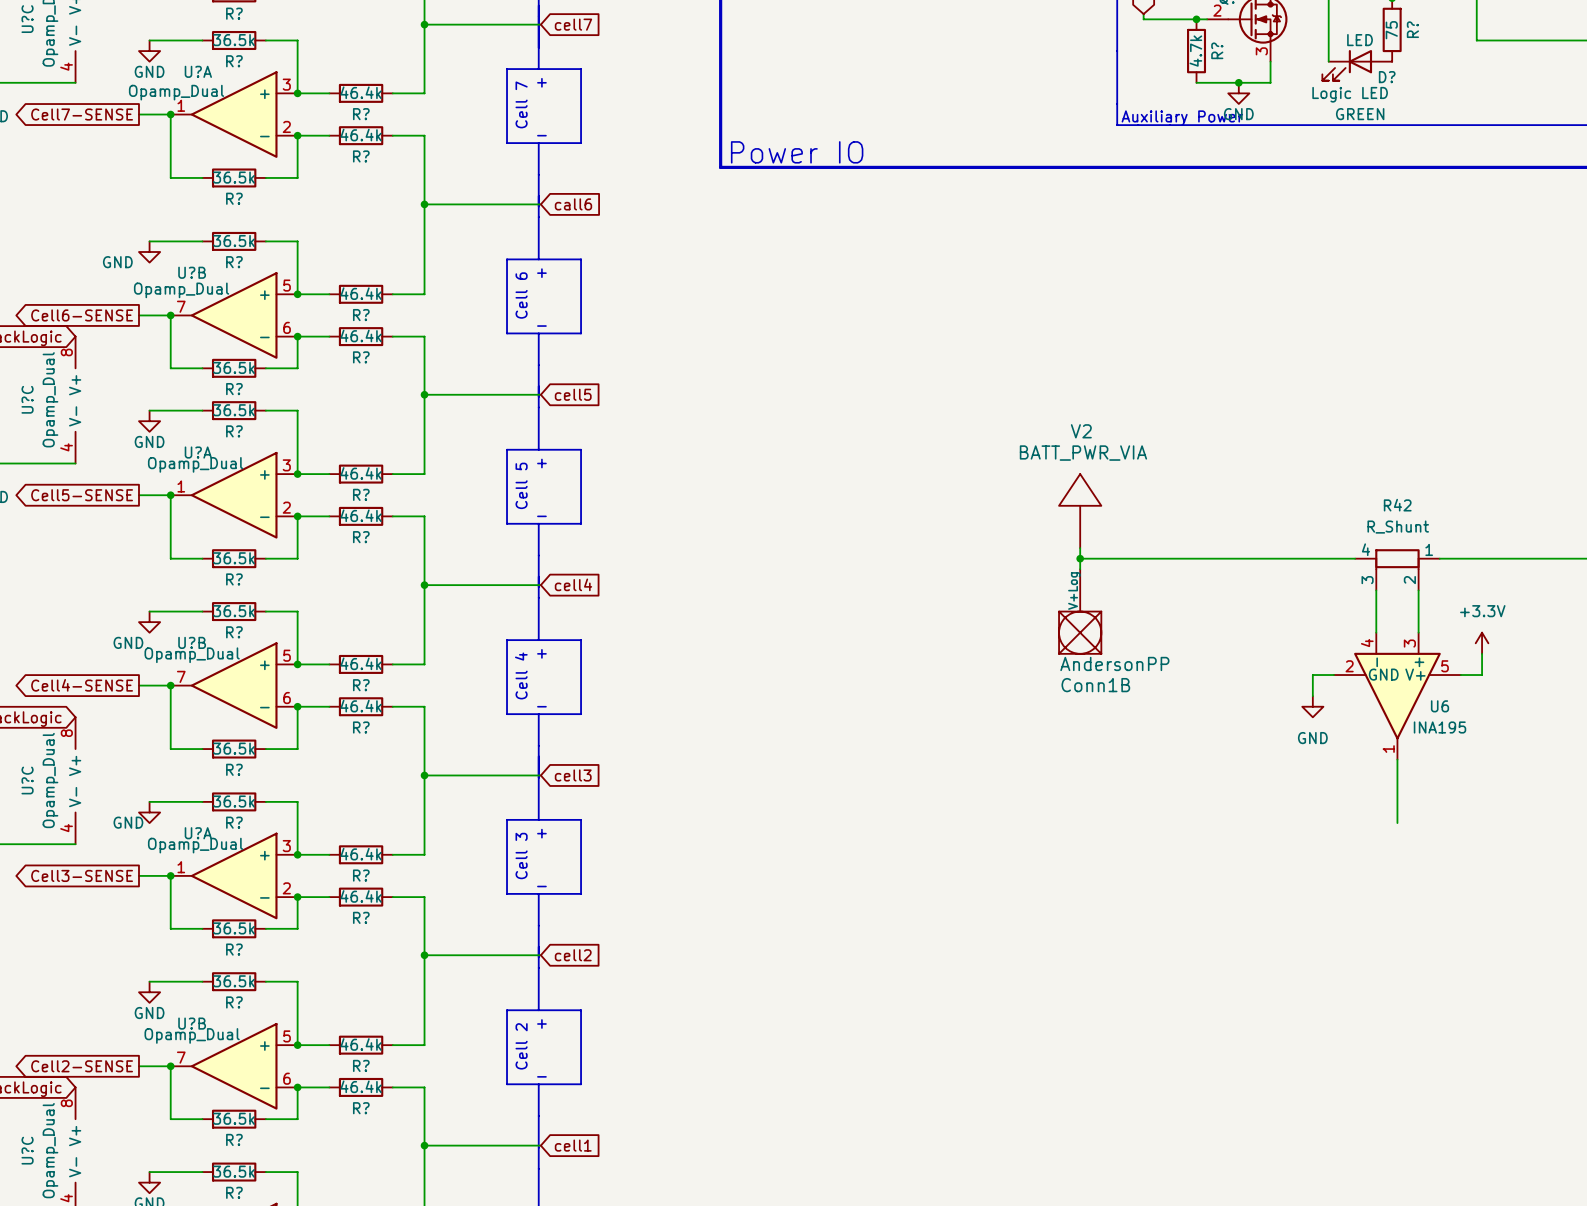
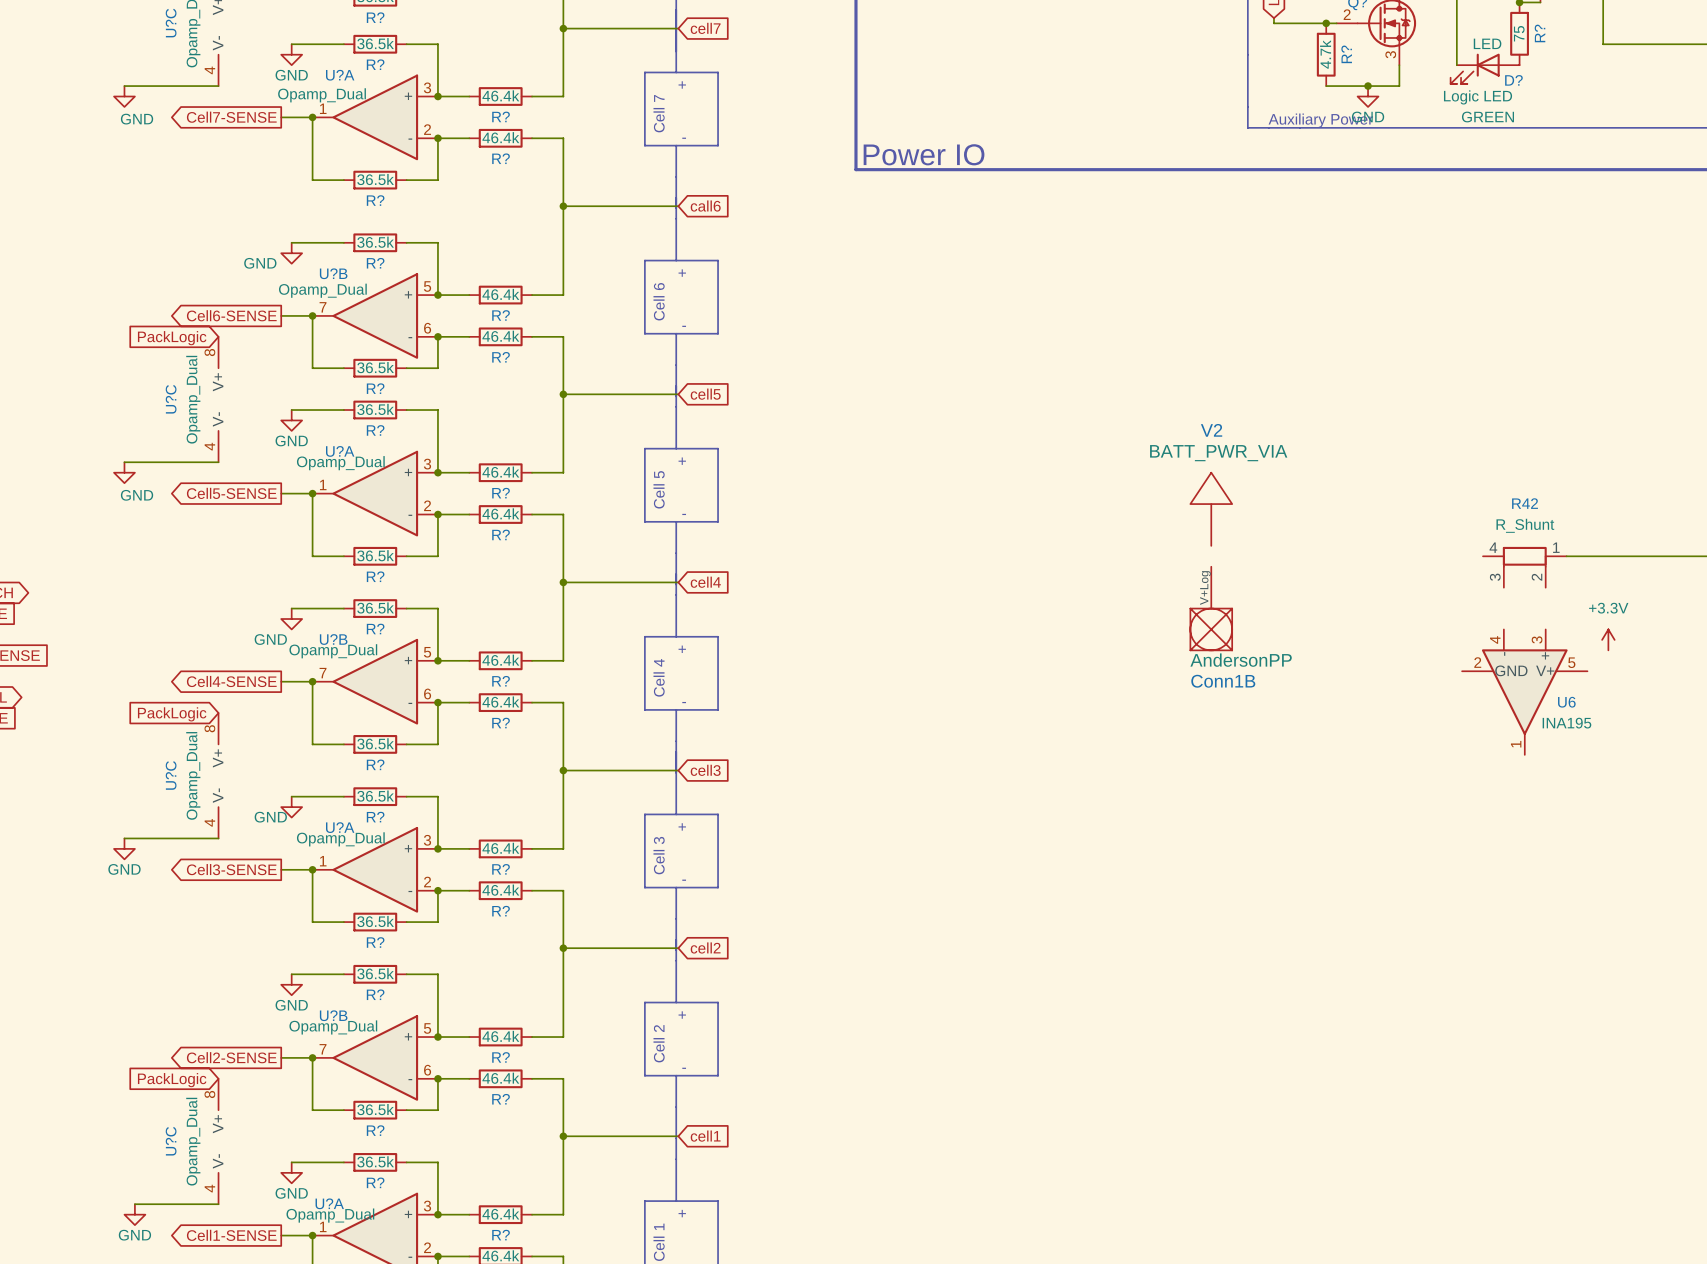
wire: (1080, 548) (1080, 569) -> none
wire: (1080, 558) (1355, 558) -> none
junction: (1080, 558) -> none
wire: (1376, 590) (1376, 632) -> none
wire: (1418, 590) (1418, 632) -> none
wire: (1482, 653) (1482, 675) (1460, 675) -> none
wire: (1333, 675) (1312, 675) (1312, 696) -> none
power symbol: GND (1312, 706) -> none
wire: (1397, 759) (1397, 823) -> none

